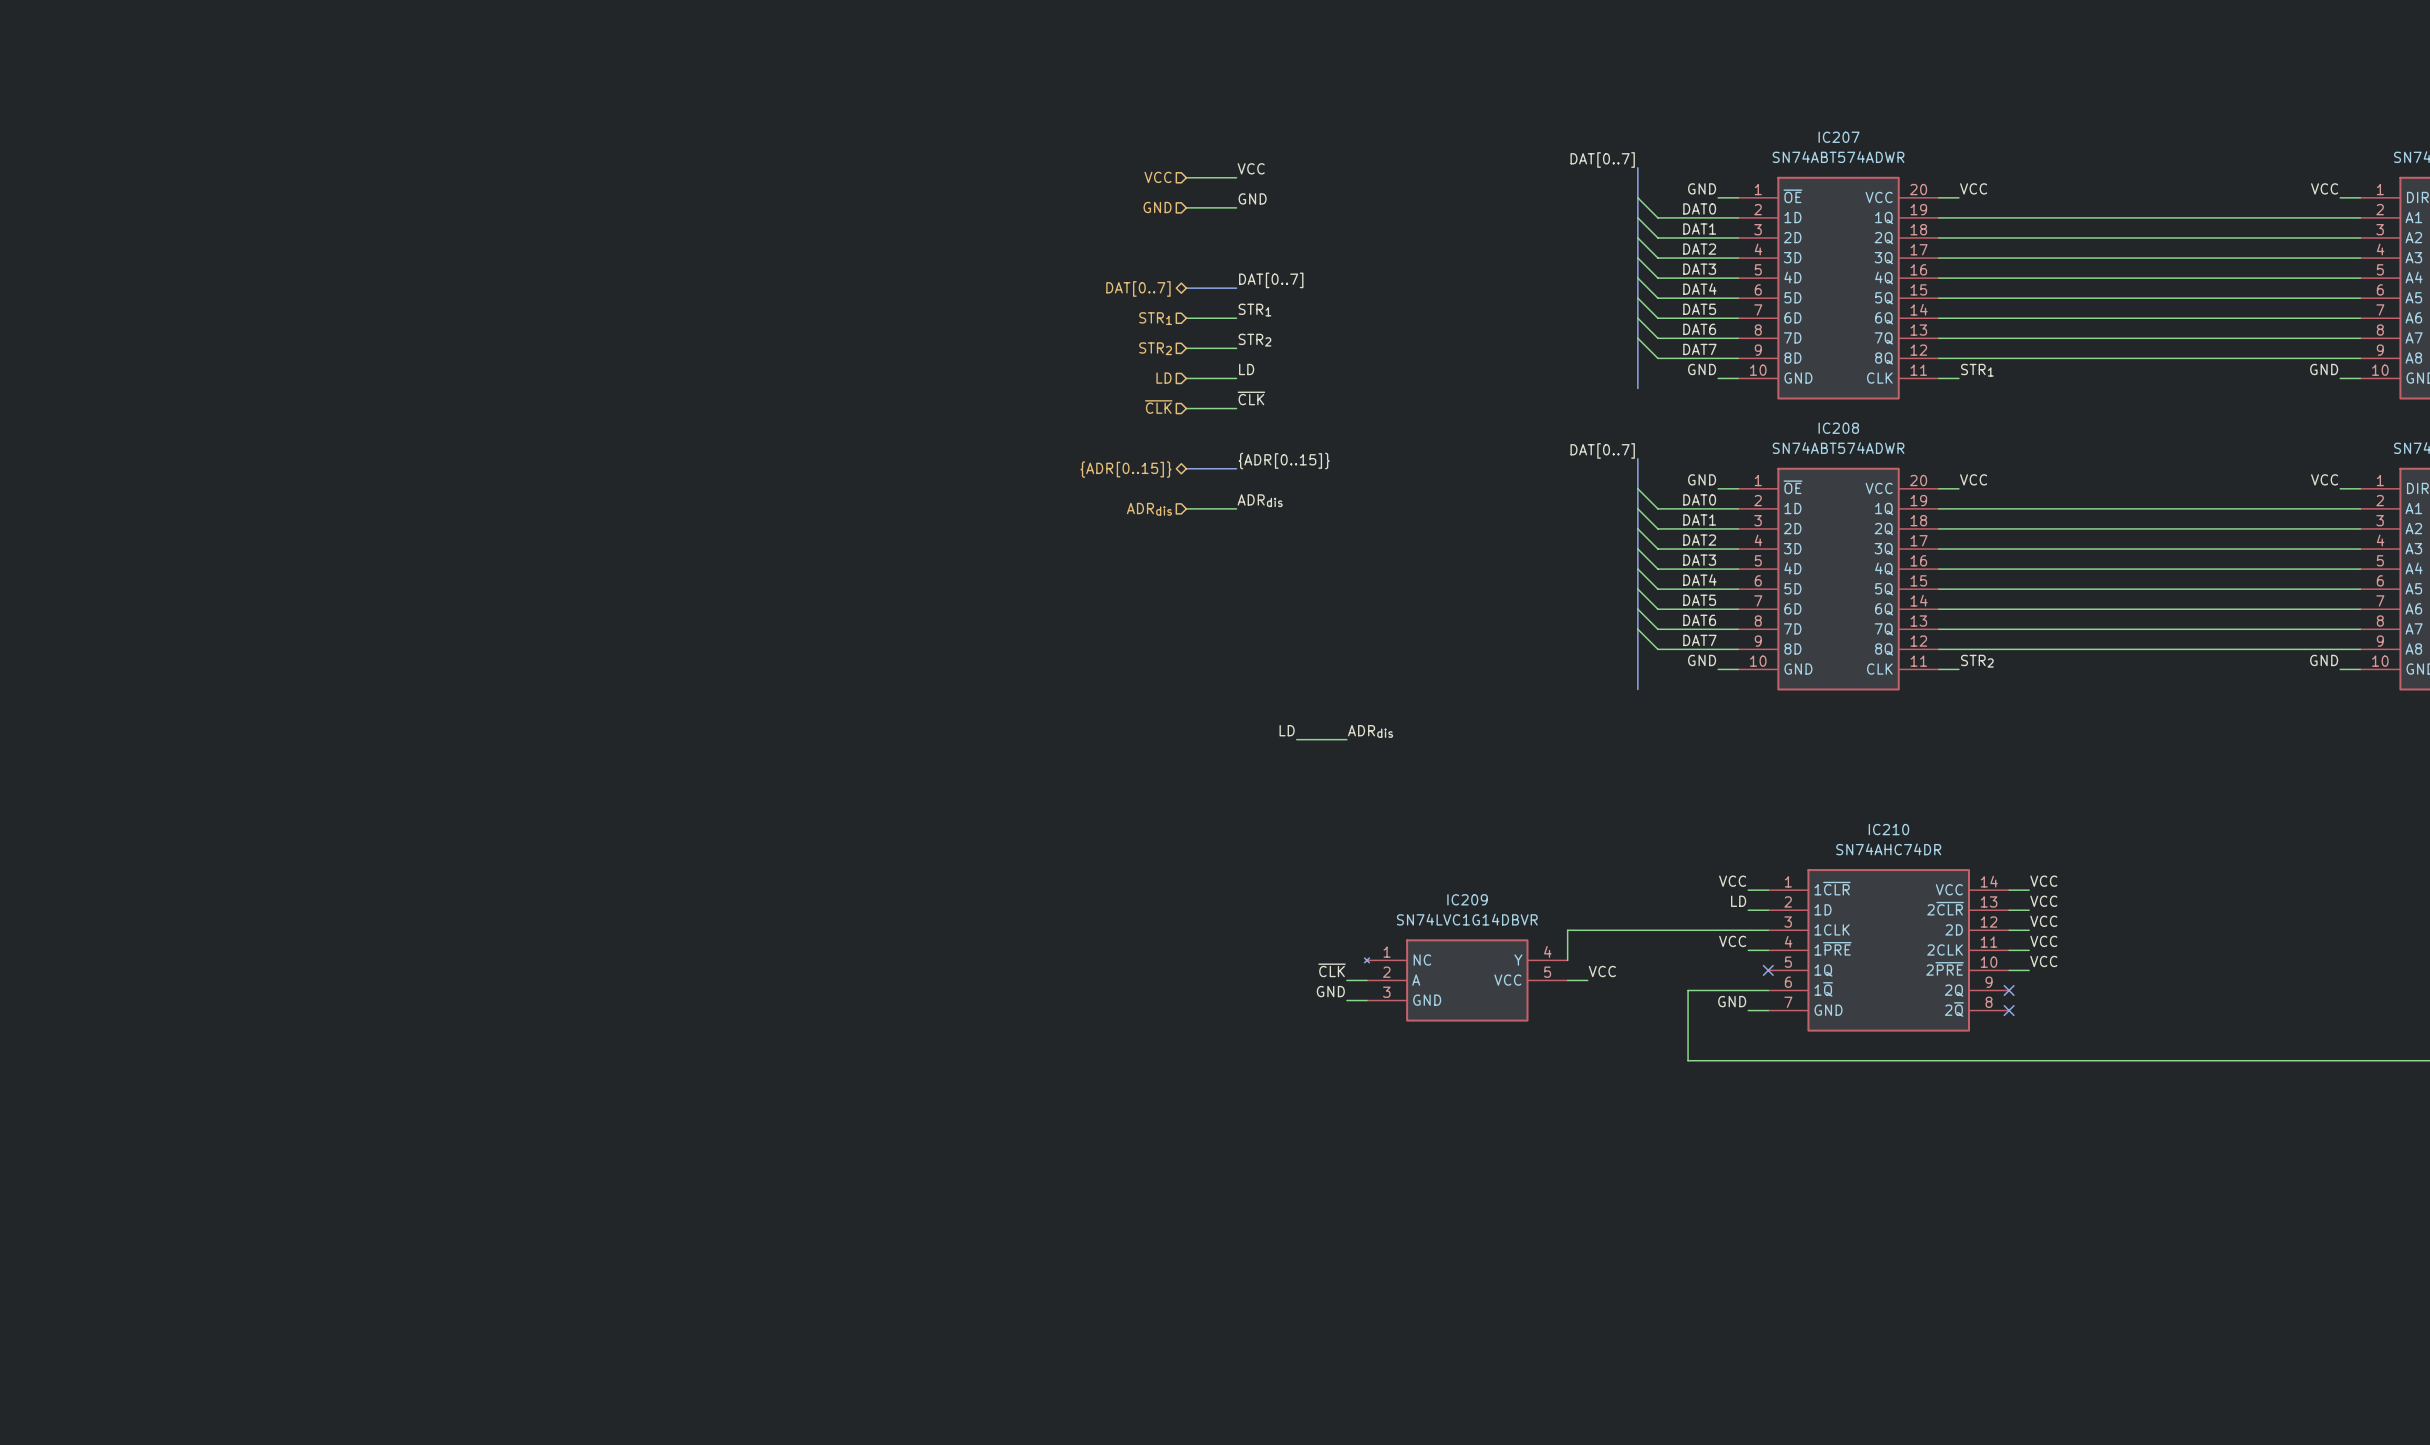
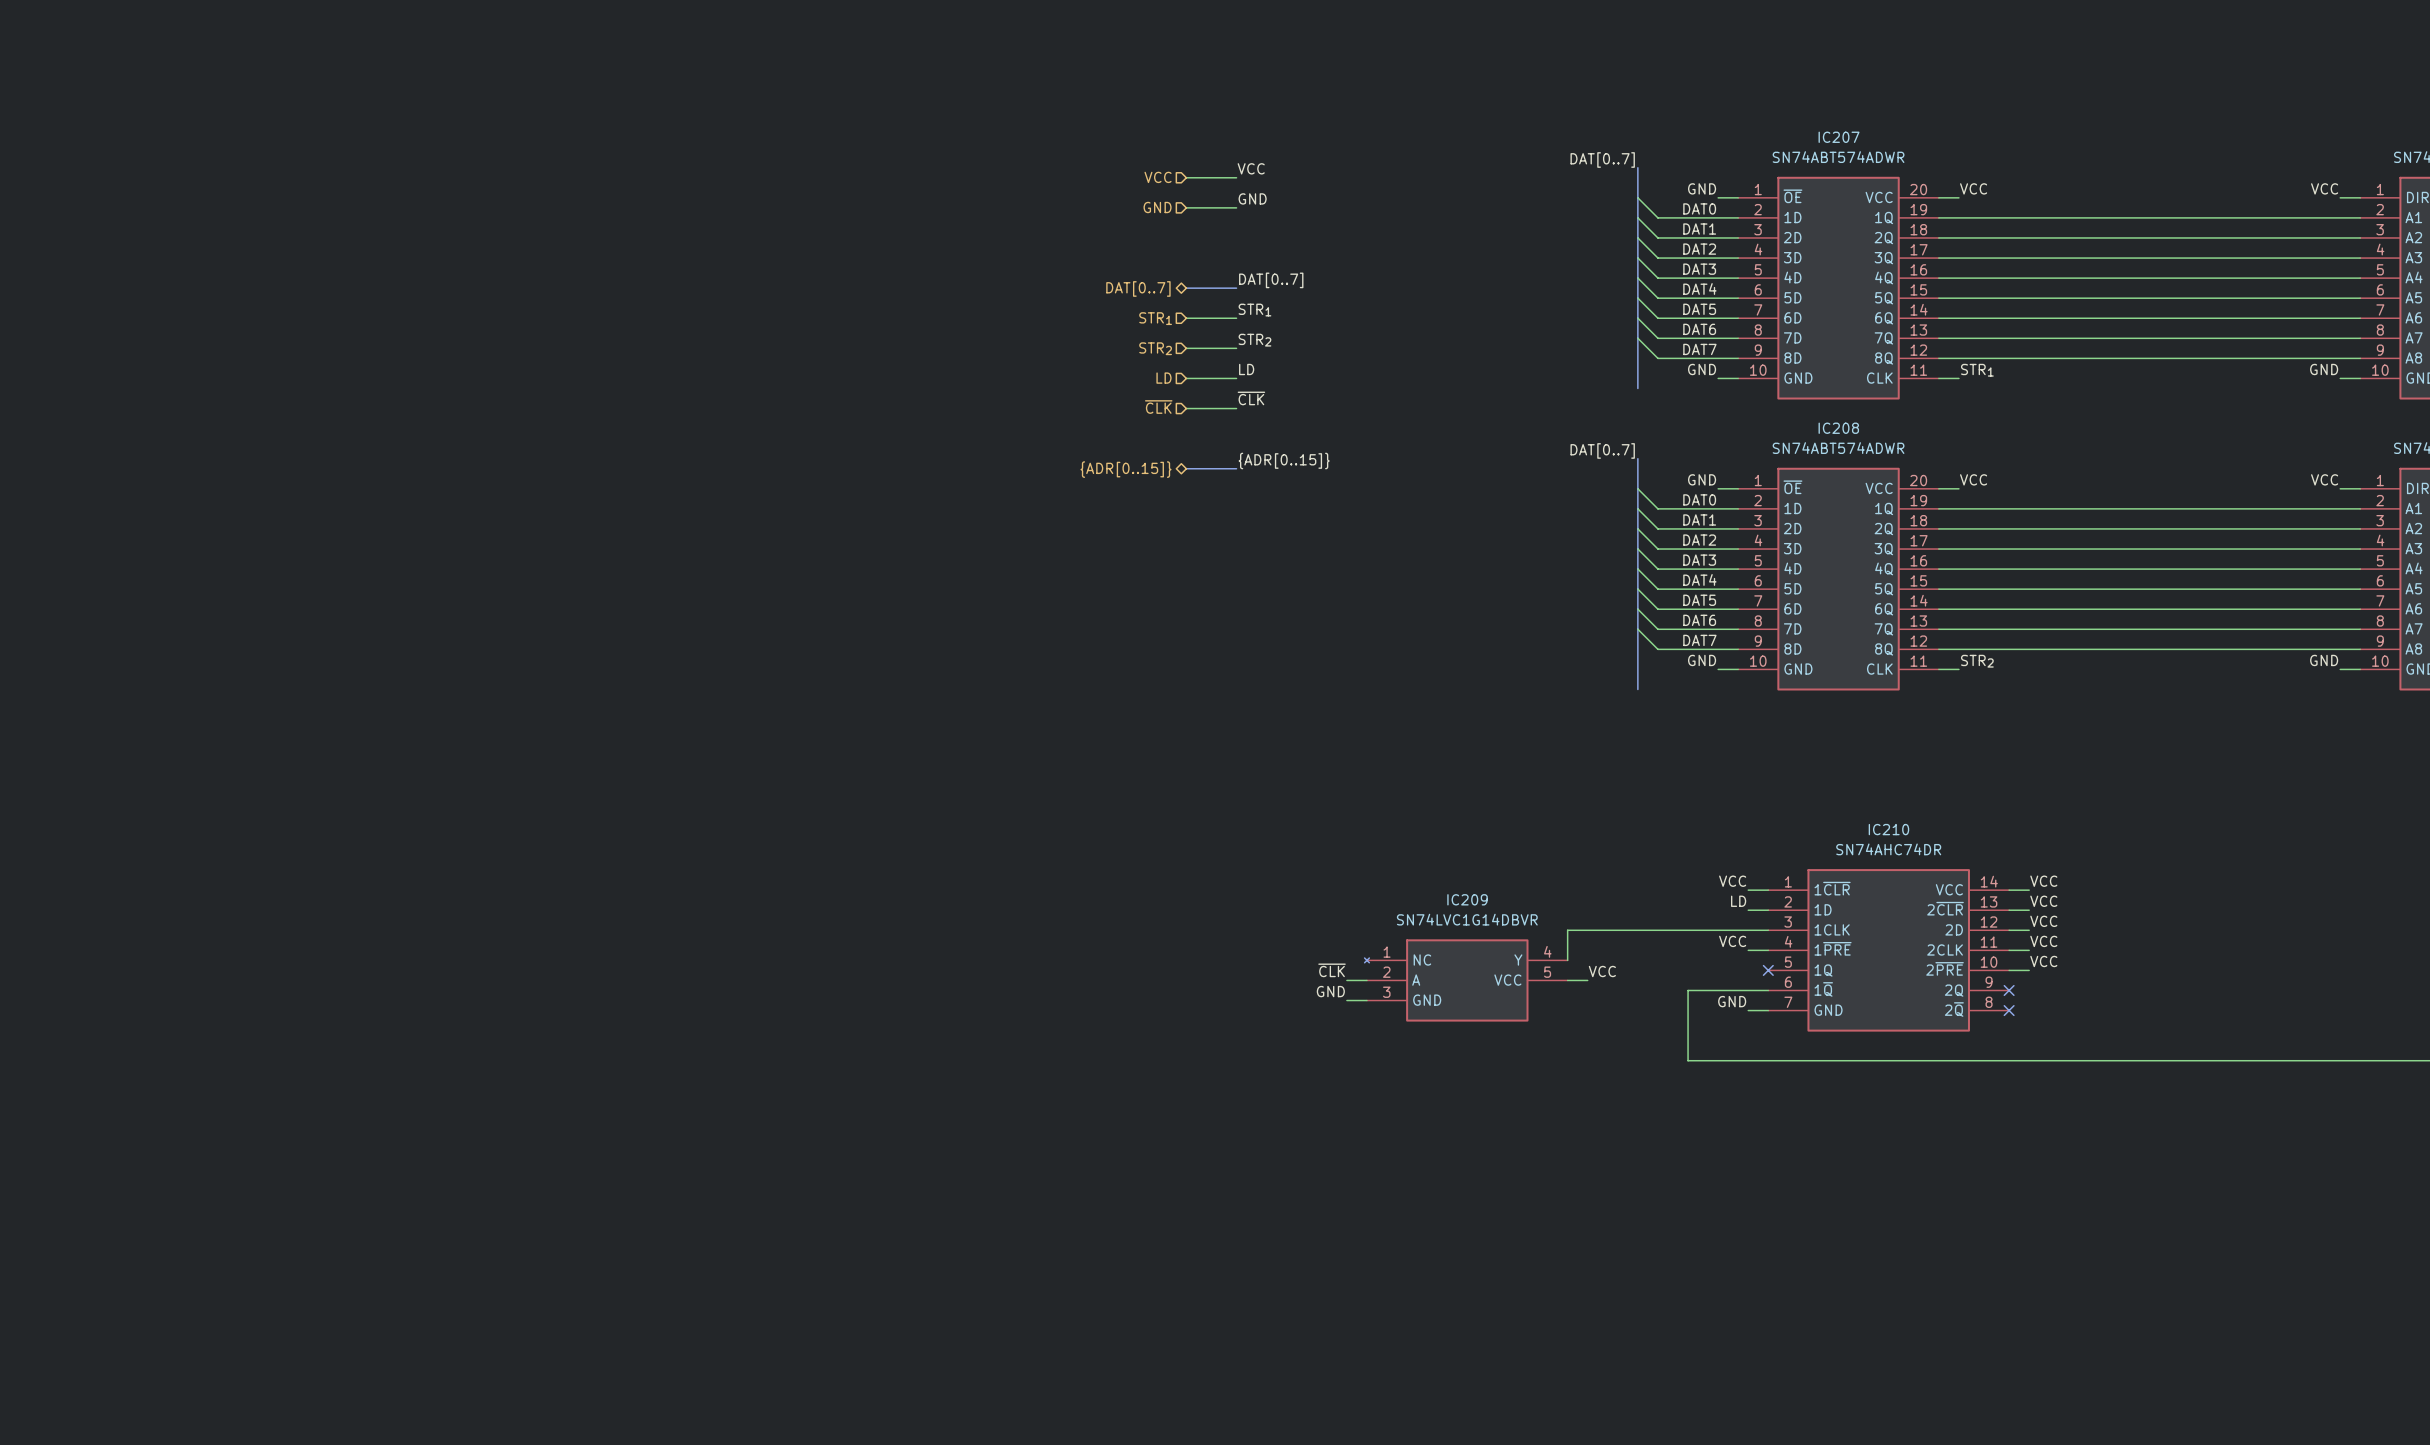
label: ADRdis (1260, 500) -> none
wire: (1186, 508) (1236, 508) -> none
hierarchical label: ADRdis (1149, 509) -> none
label: LD (1287, 730) -> none
label: ADRdis (1370, 731) -> none
wire: (1296, 739) (1346, 739) -> none

